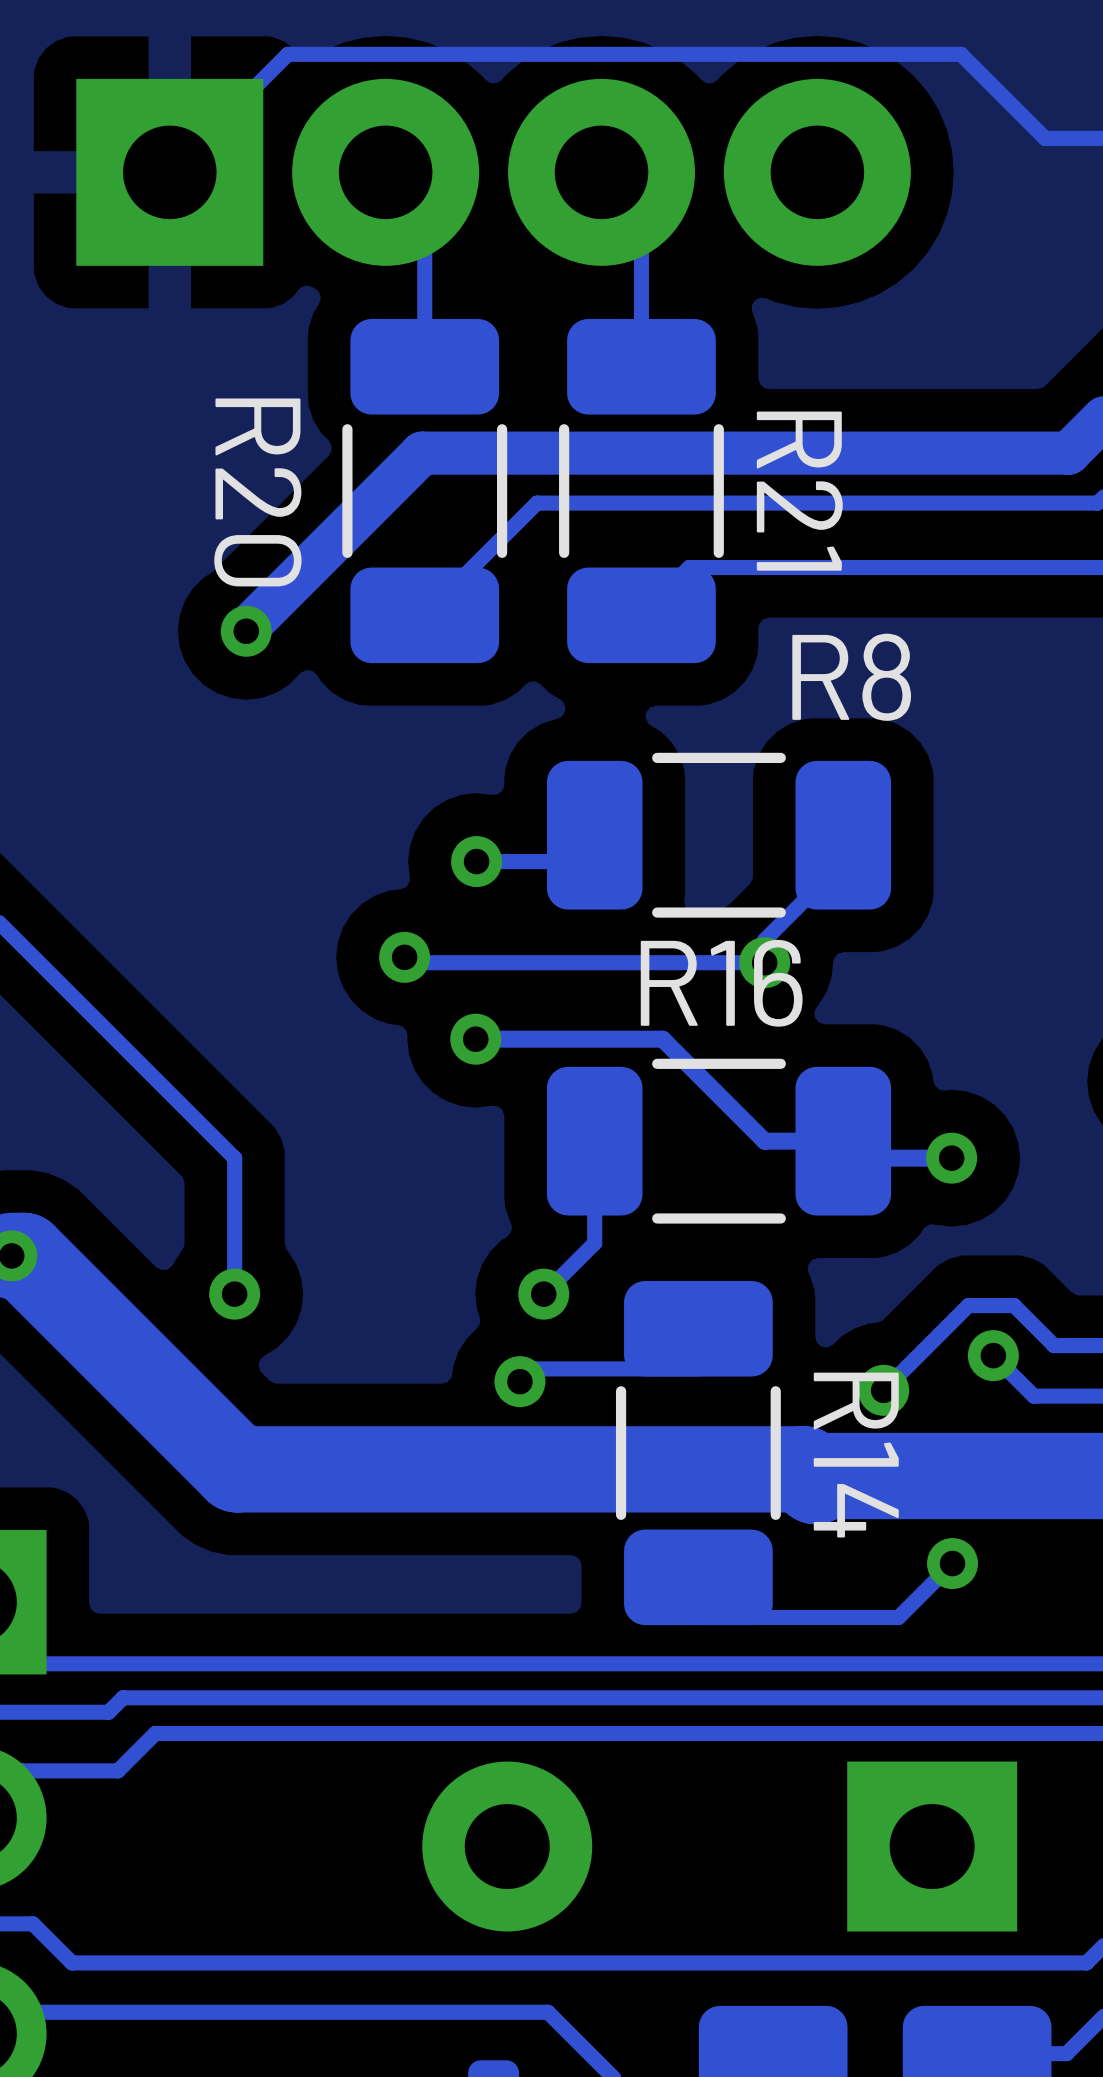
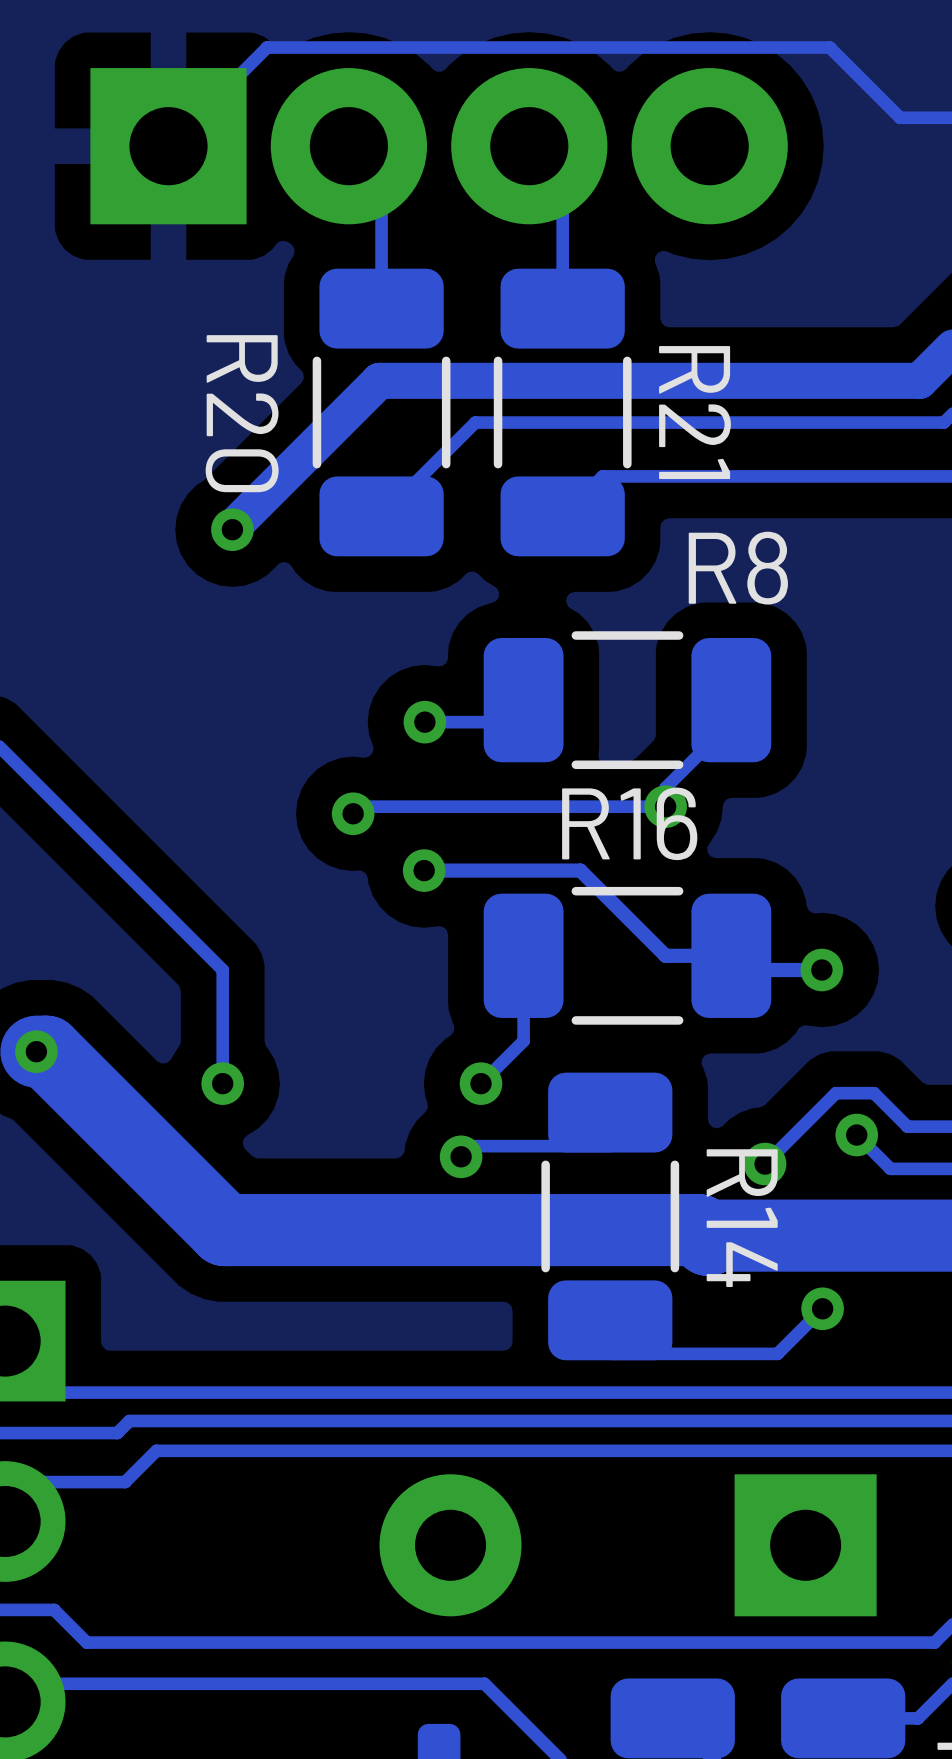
via position: (404, 957) -> (353, 813)

